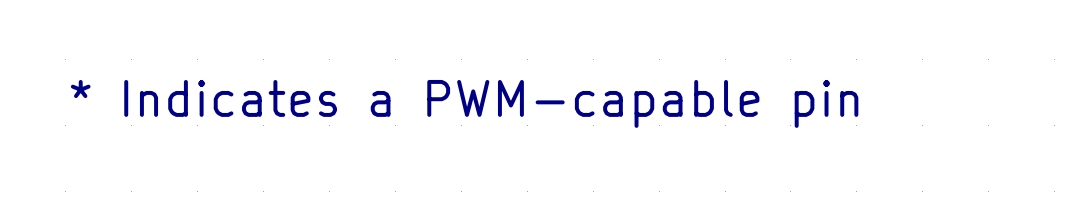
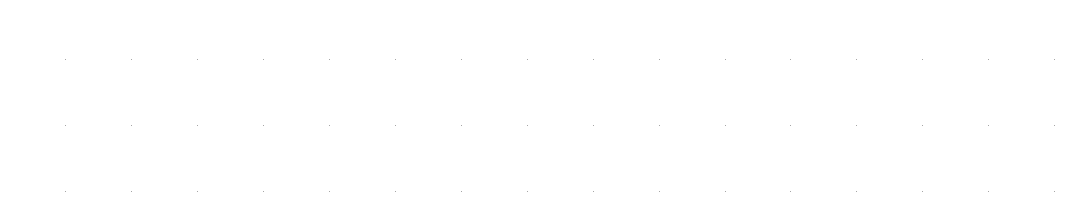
text: * Indicates a PWM-capable pin (464, 103) -> none

